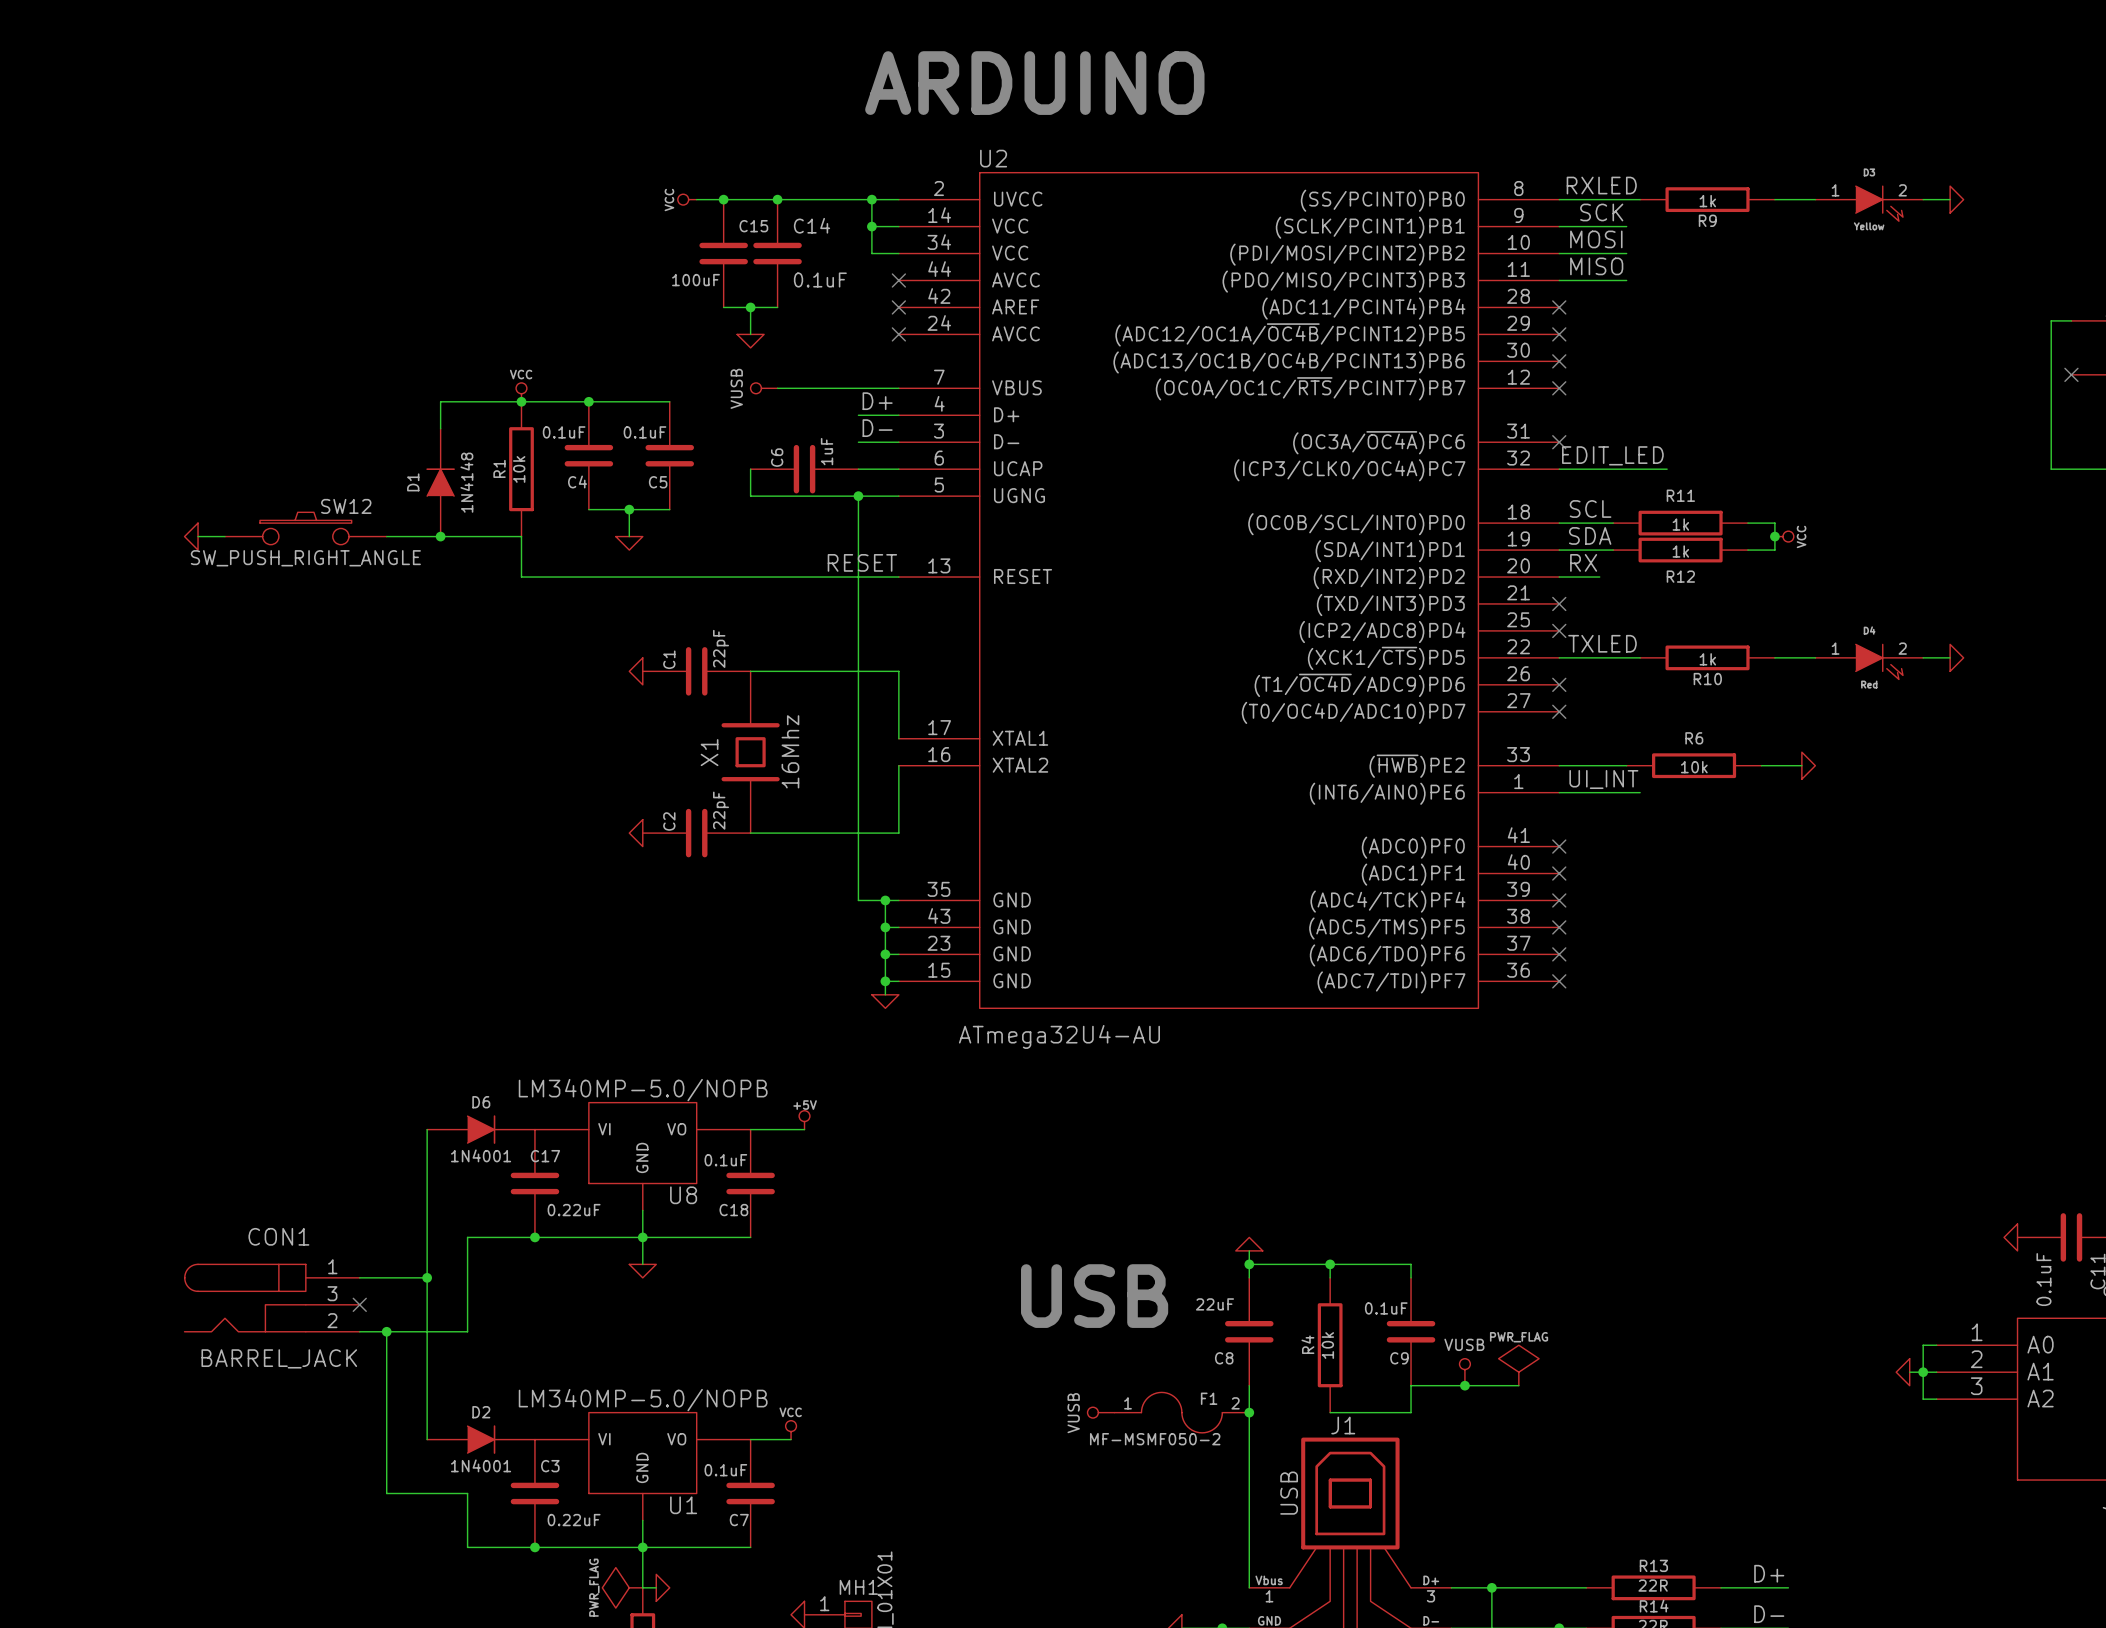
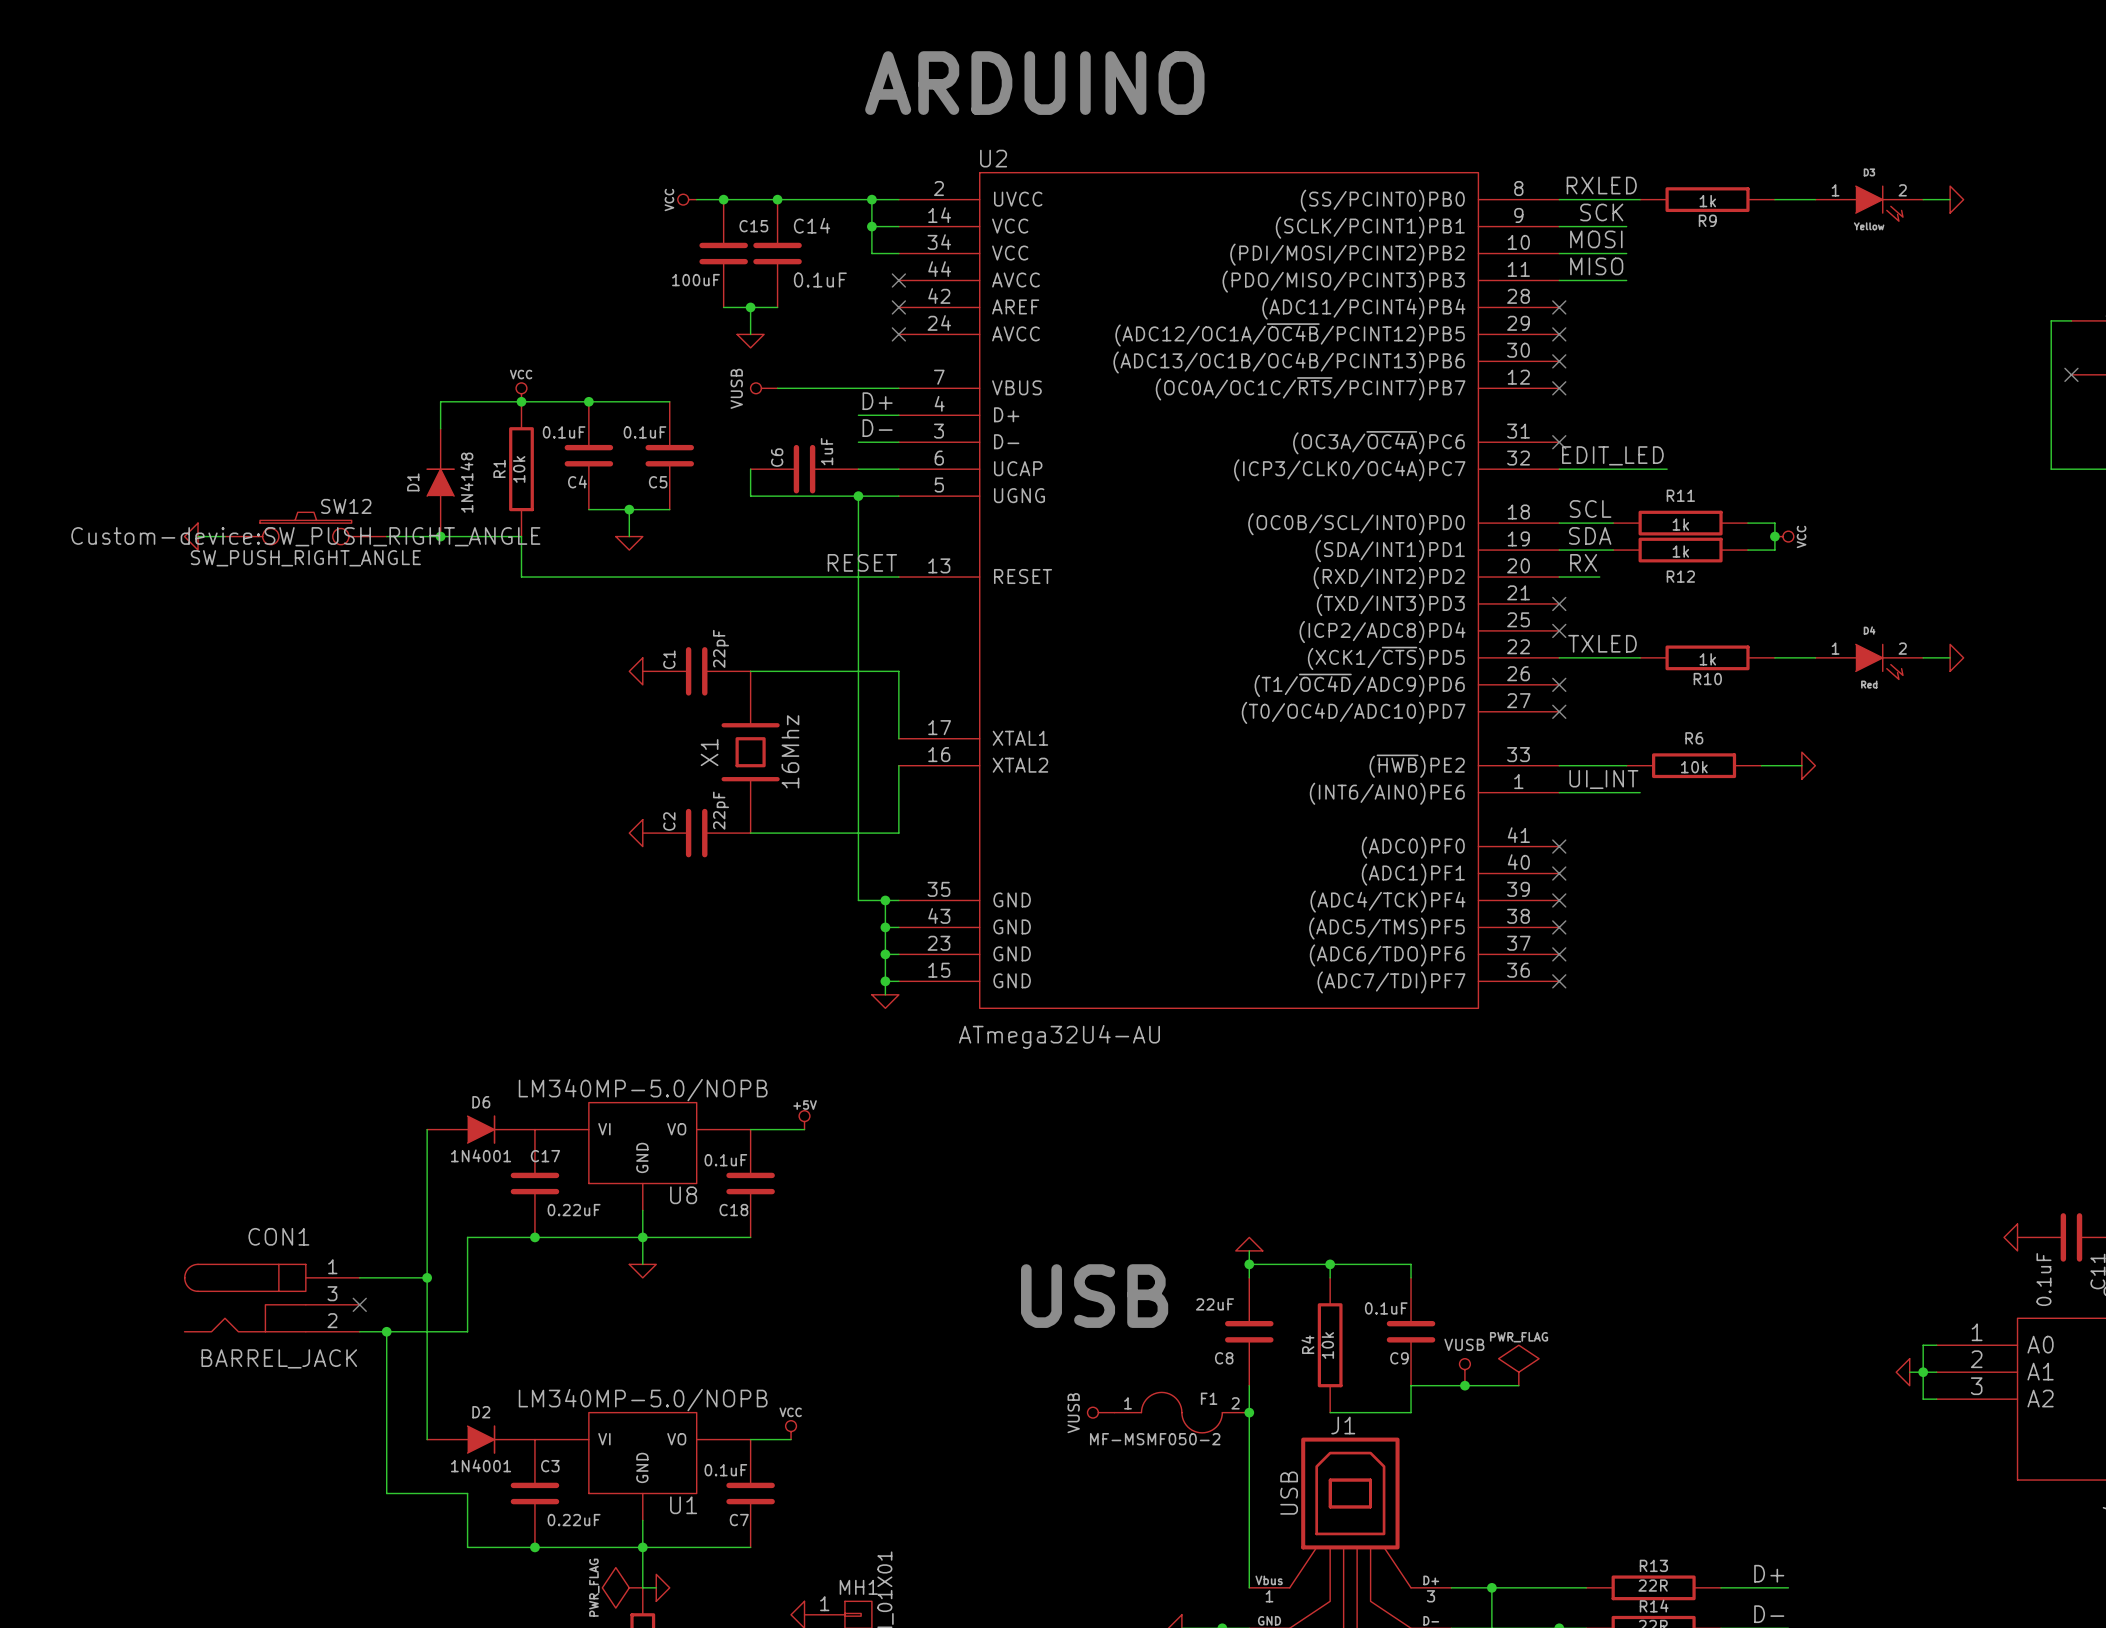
SW12 text: none -> Custom-device:SW_PUSH_RIGHT_ANGLE (305, 536)

